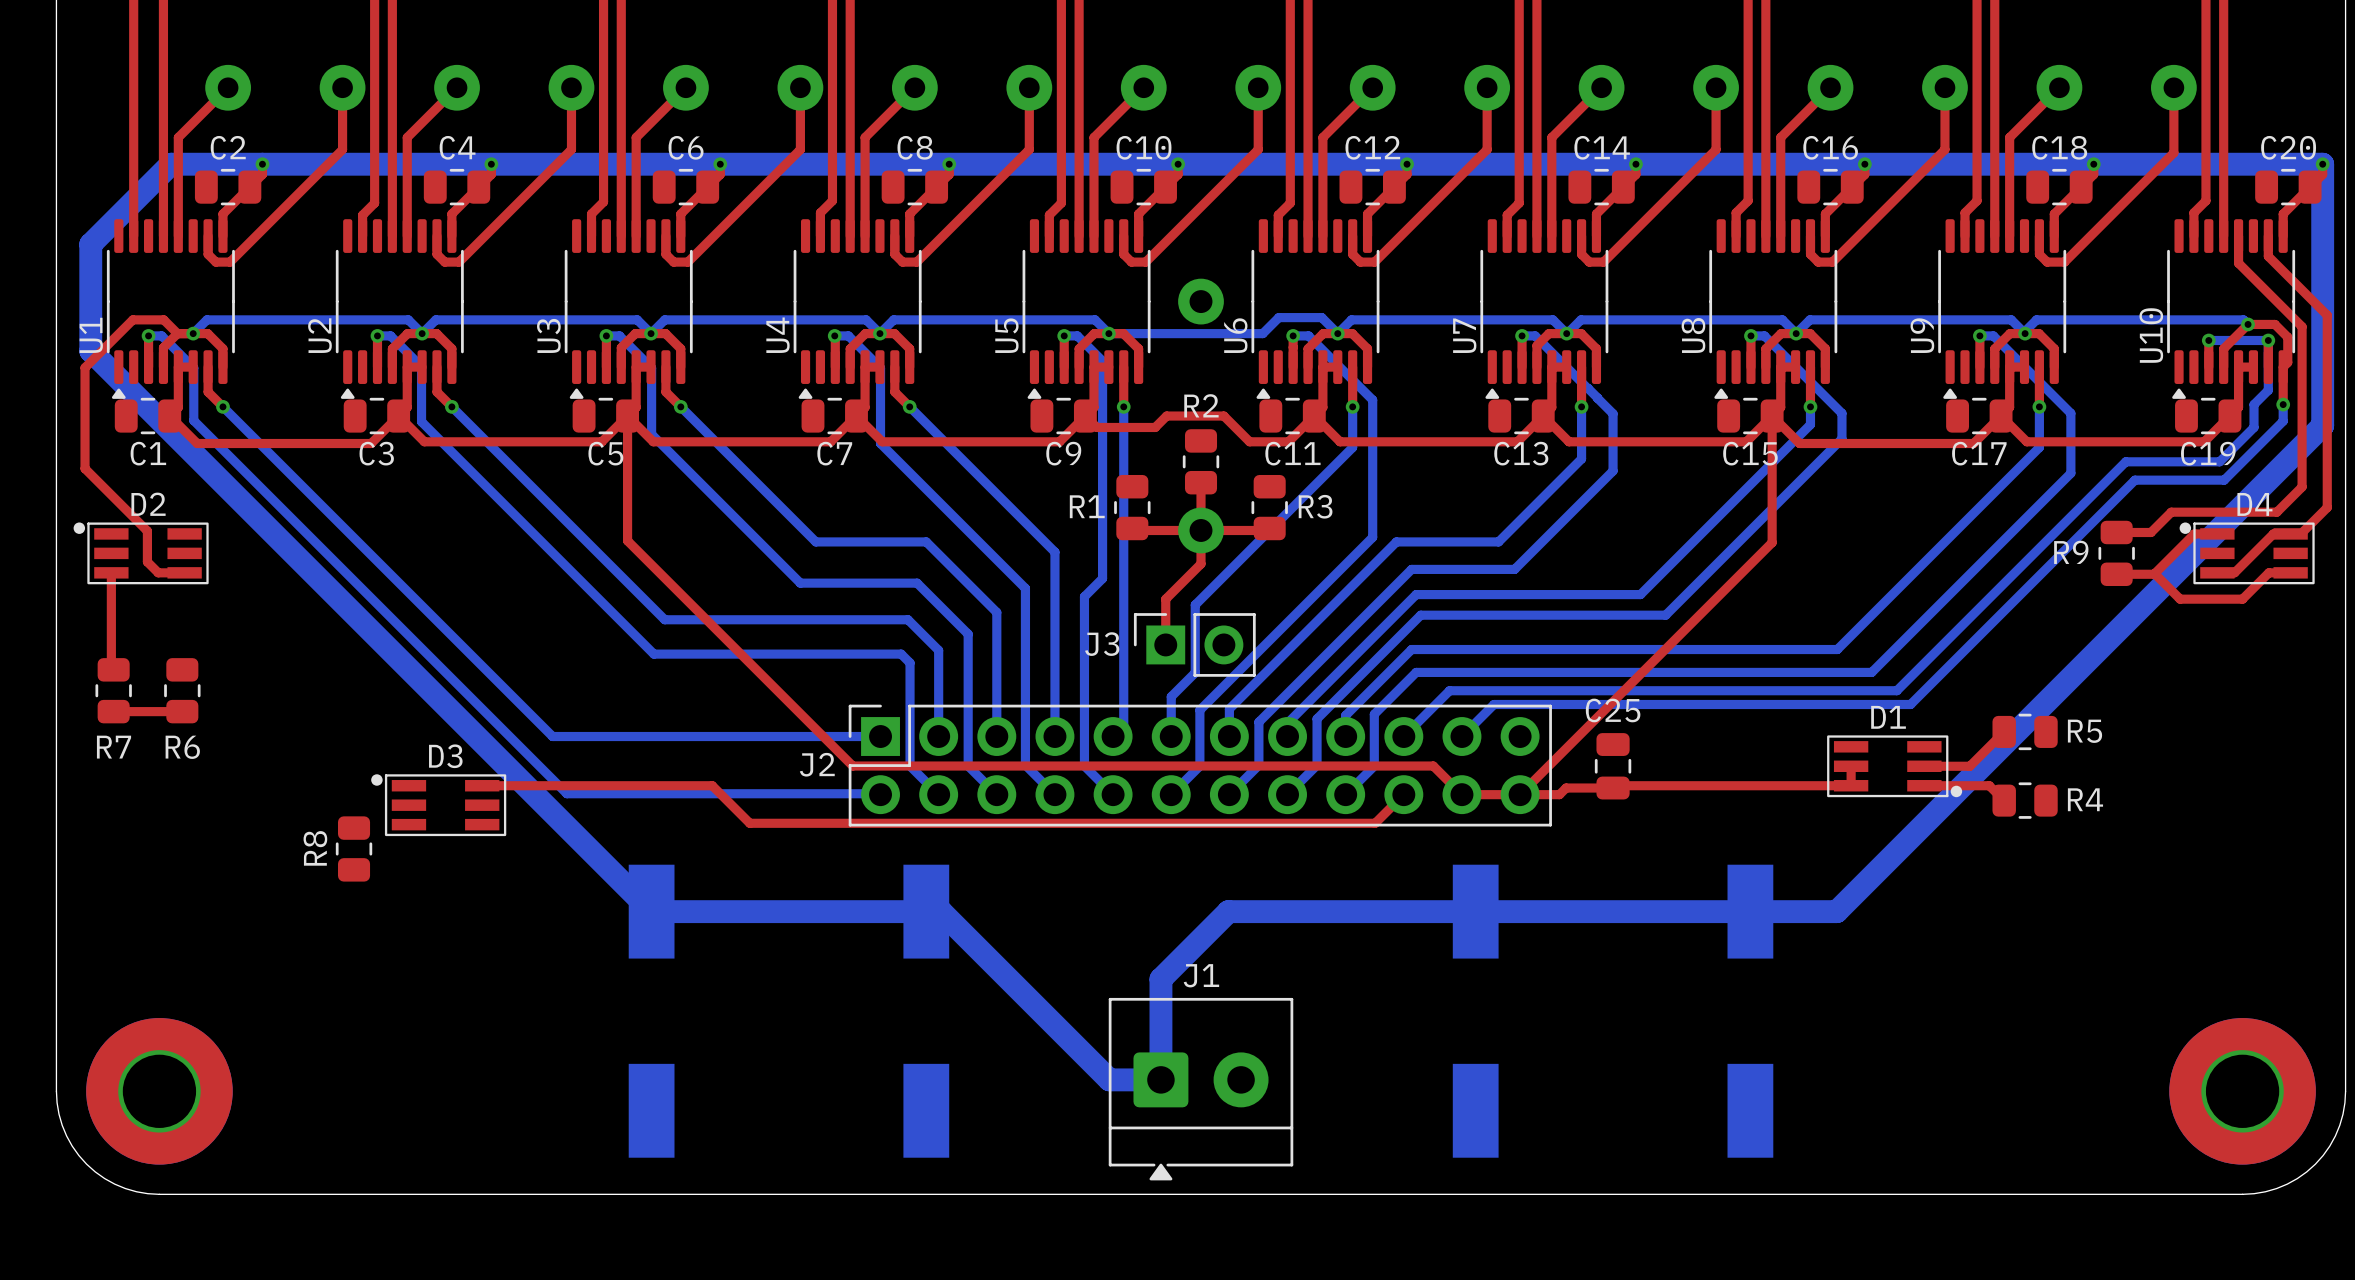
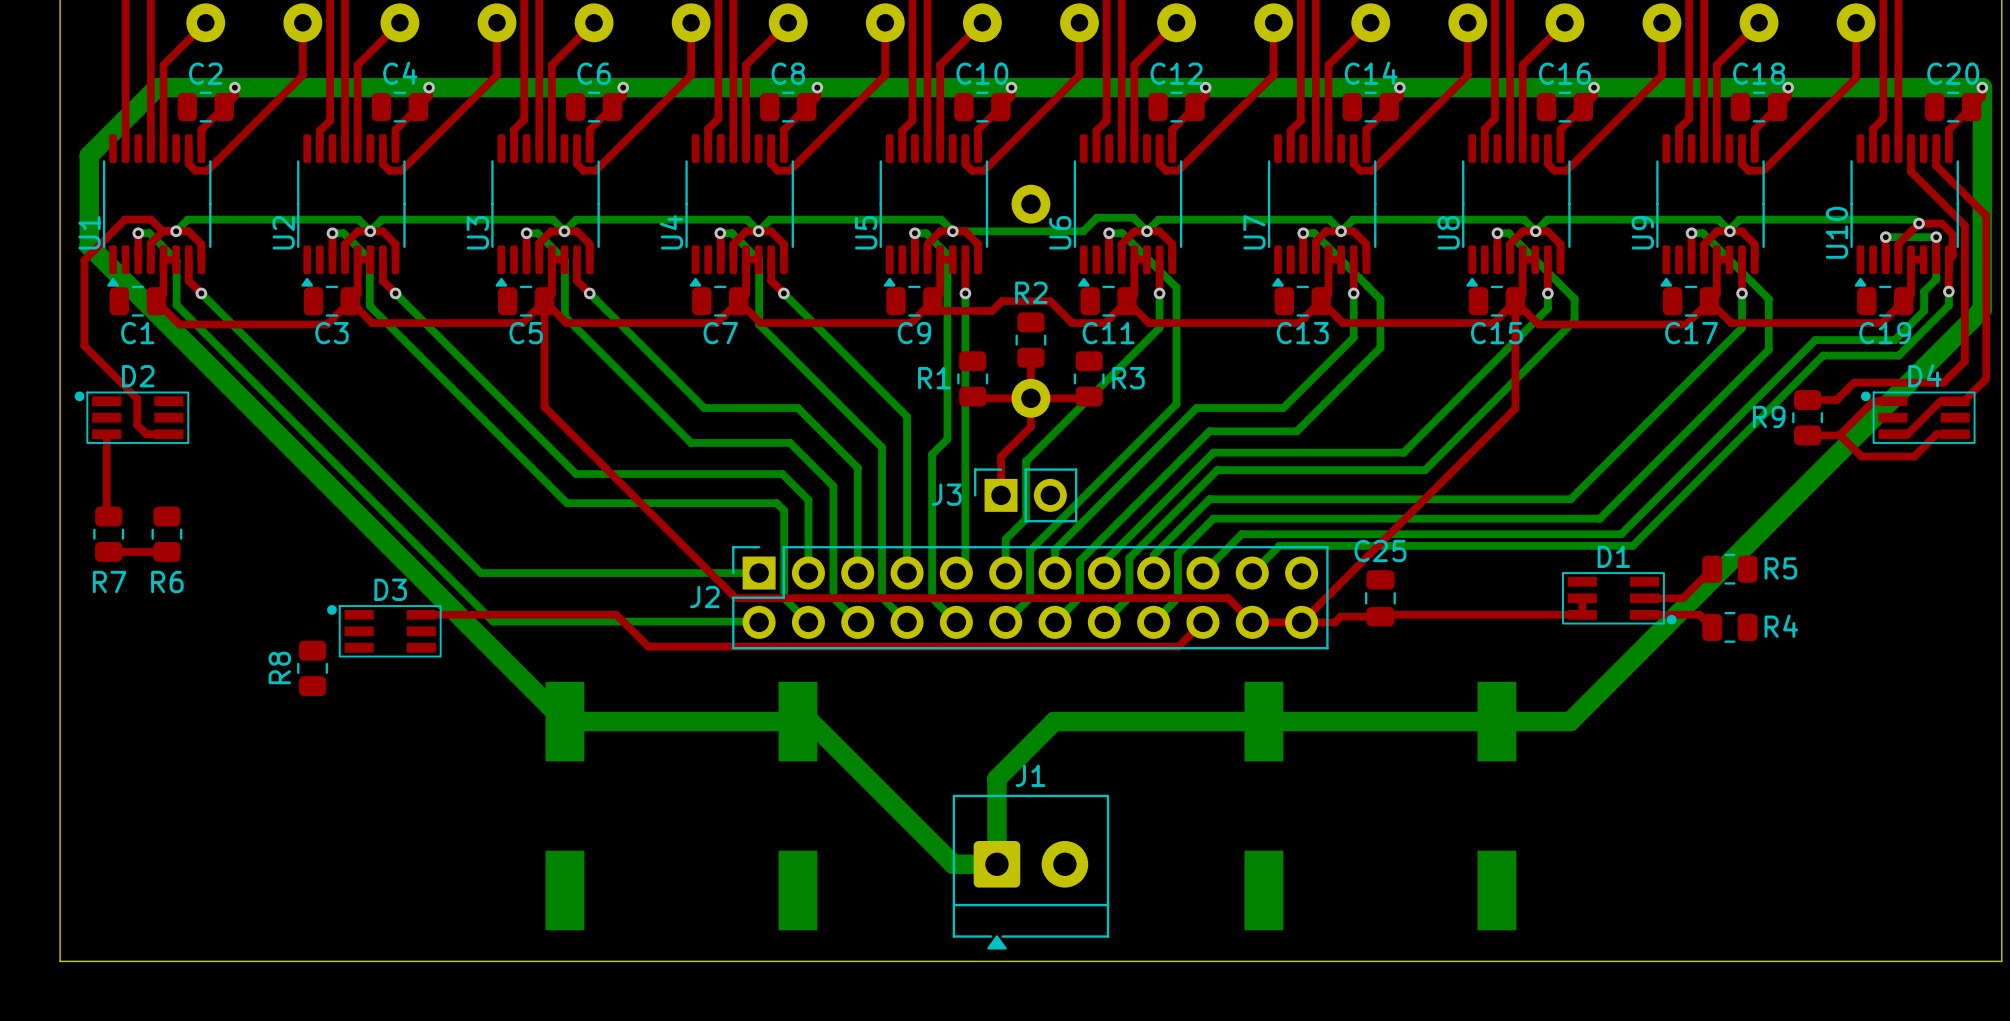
board edge: (56, 1091) (59, 1114) (66, 1136) (86, 1164) (114, 1184) (136, 1191) (159, 1194) -> (60, 874) (60, 961) (147, 961)
part: (159, 1091) -> none
part: (2242, 1091) -> none
board edge: (2345, 1091) (2342, 1114) (2335, 1136) (2315, 1164) (2297, 1178) (2276, 1188) (2242, 1194) -> (2001, 874) (2001, 961) (1914, 961)

